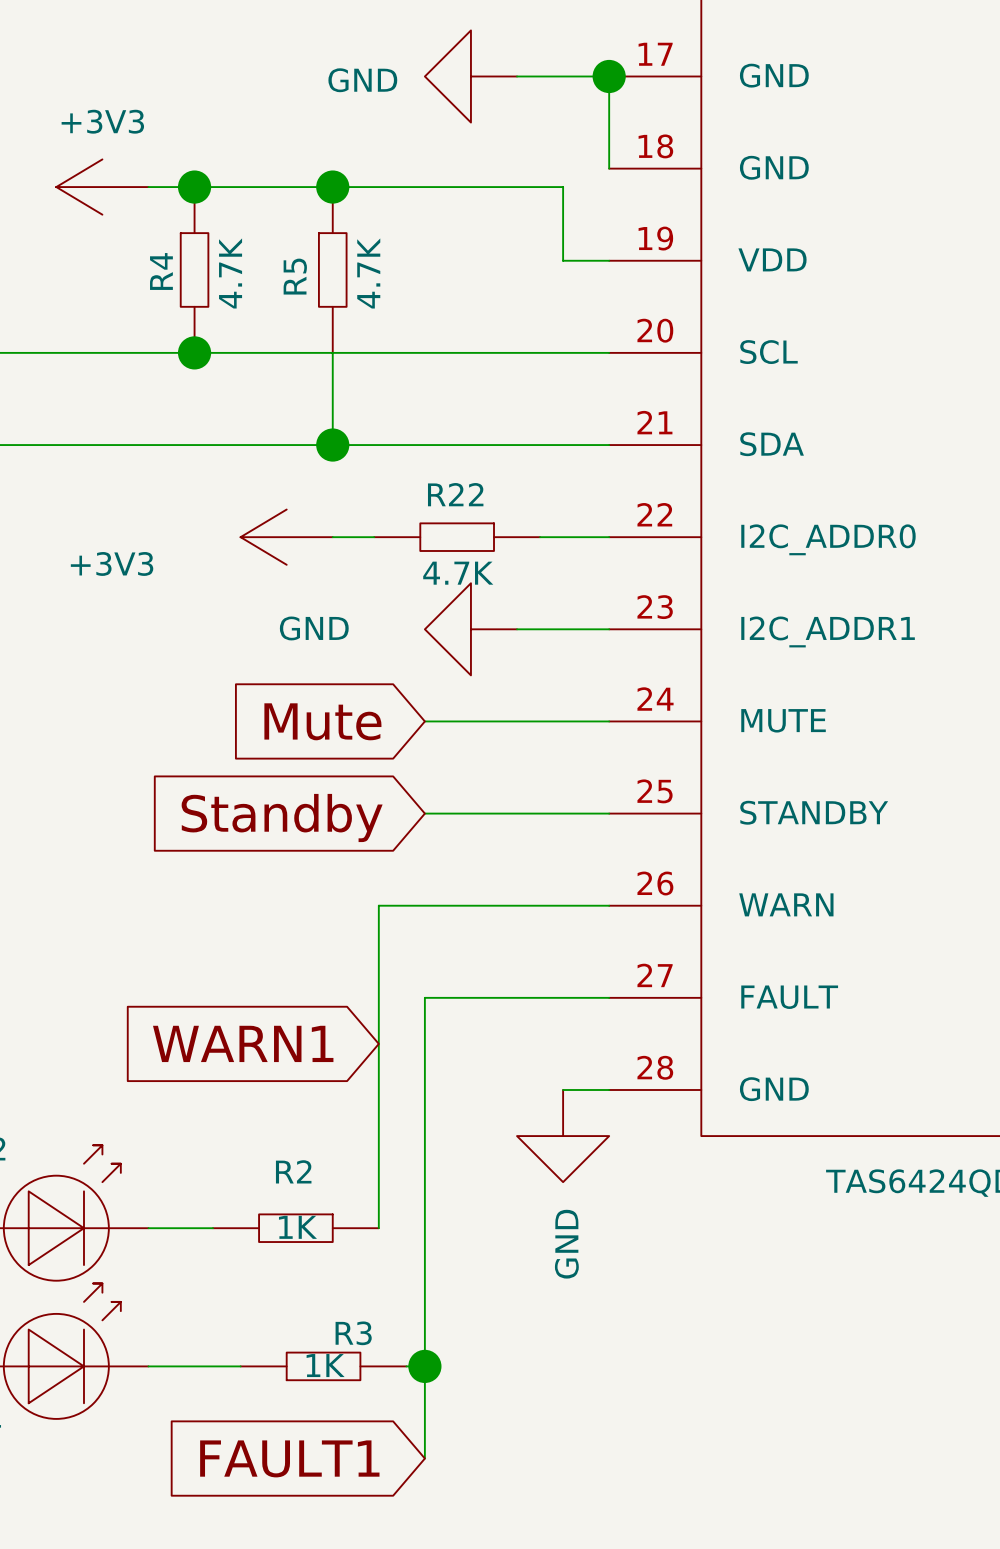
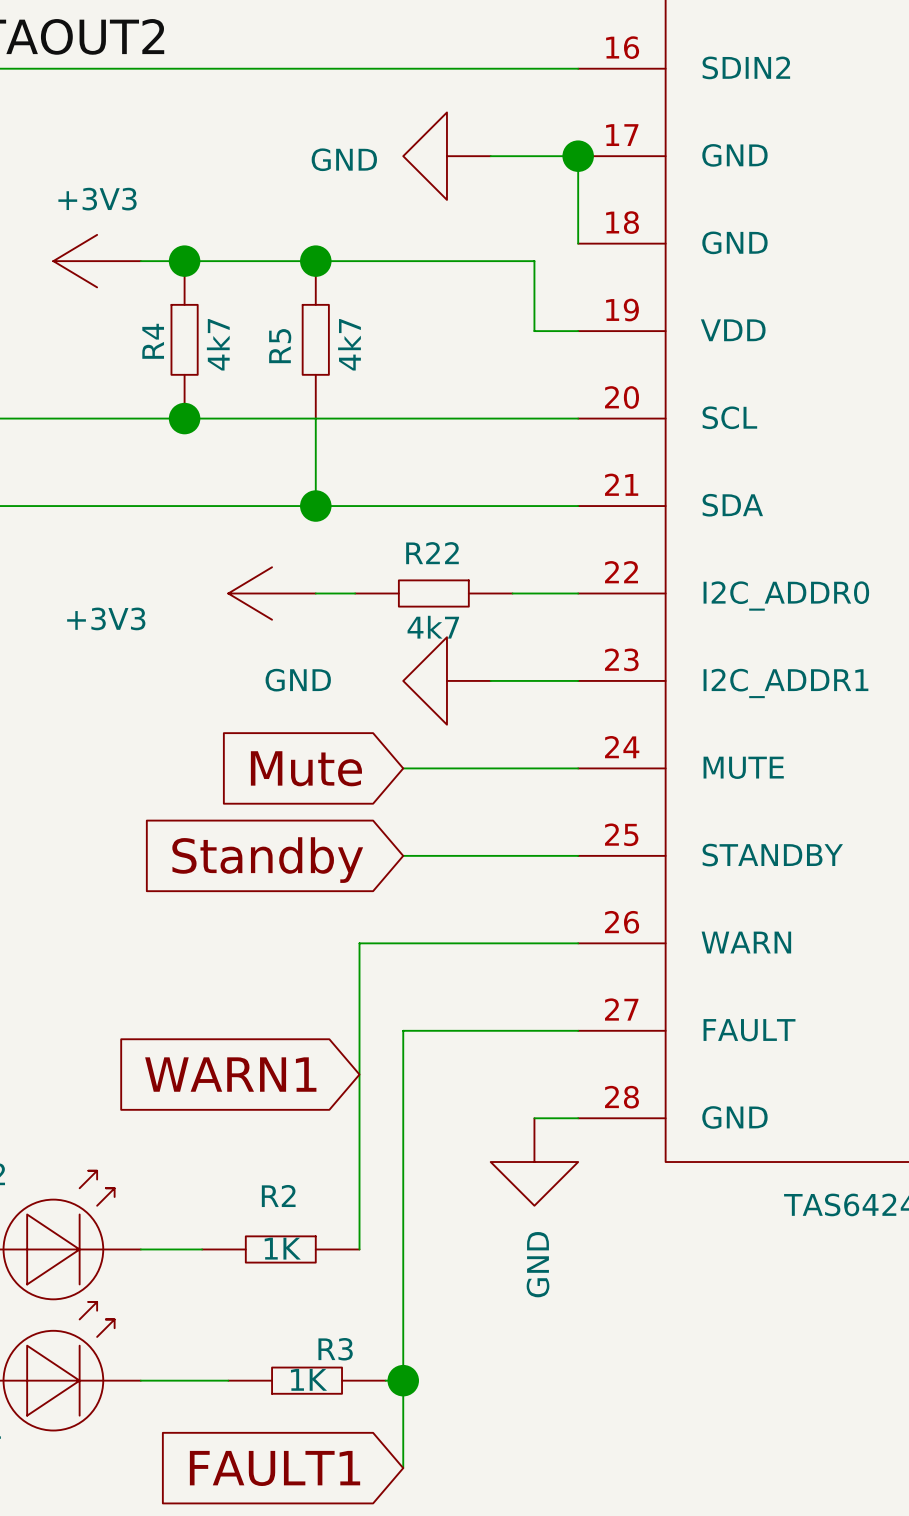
R4 value: 4.7K (230, 273) -> 4k7 (218, 344)
R5 value: 4.7K (368, 273) -> 4k7 (349, 344)
R22 value: 4.7K (458, 573) -> 4k7 (433, 627)

